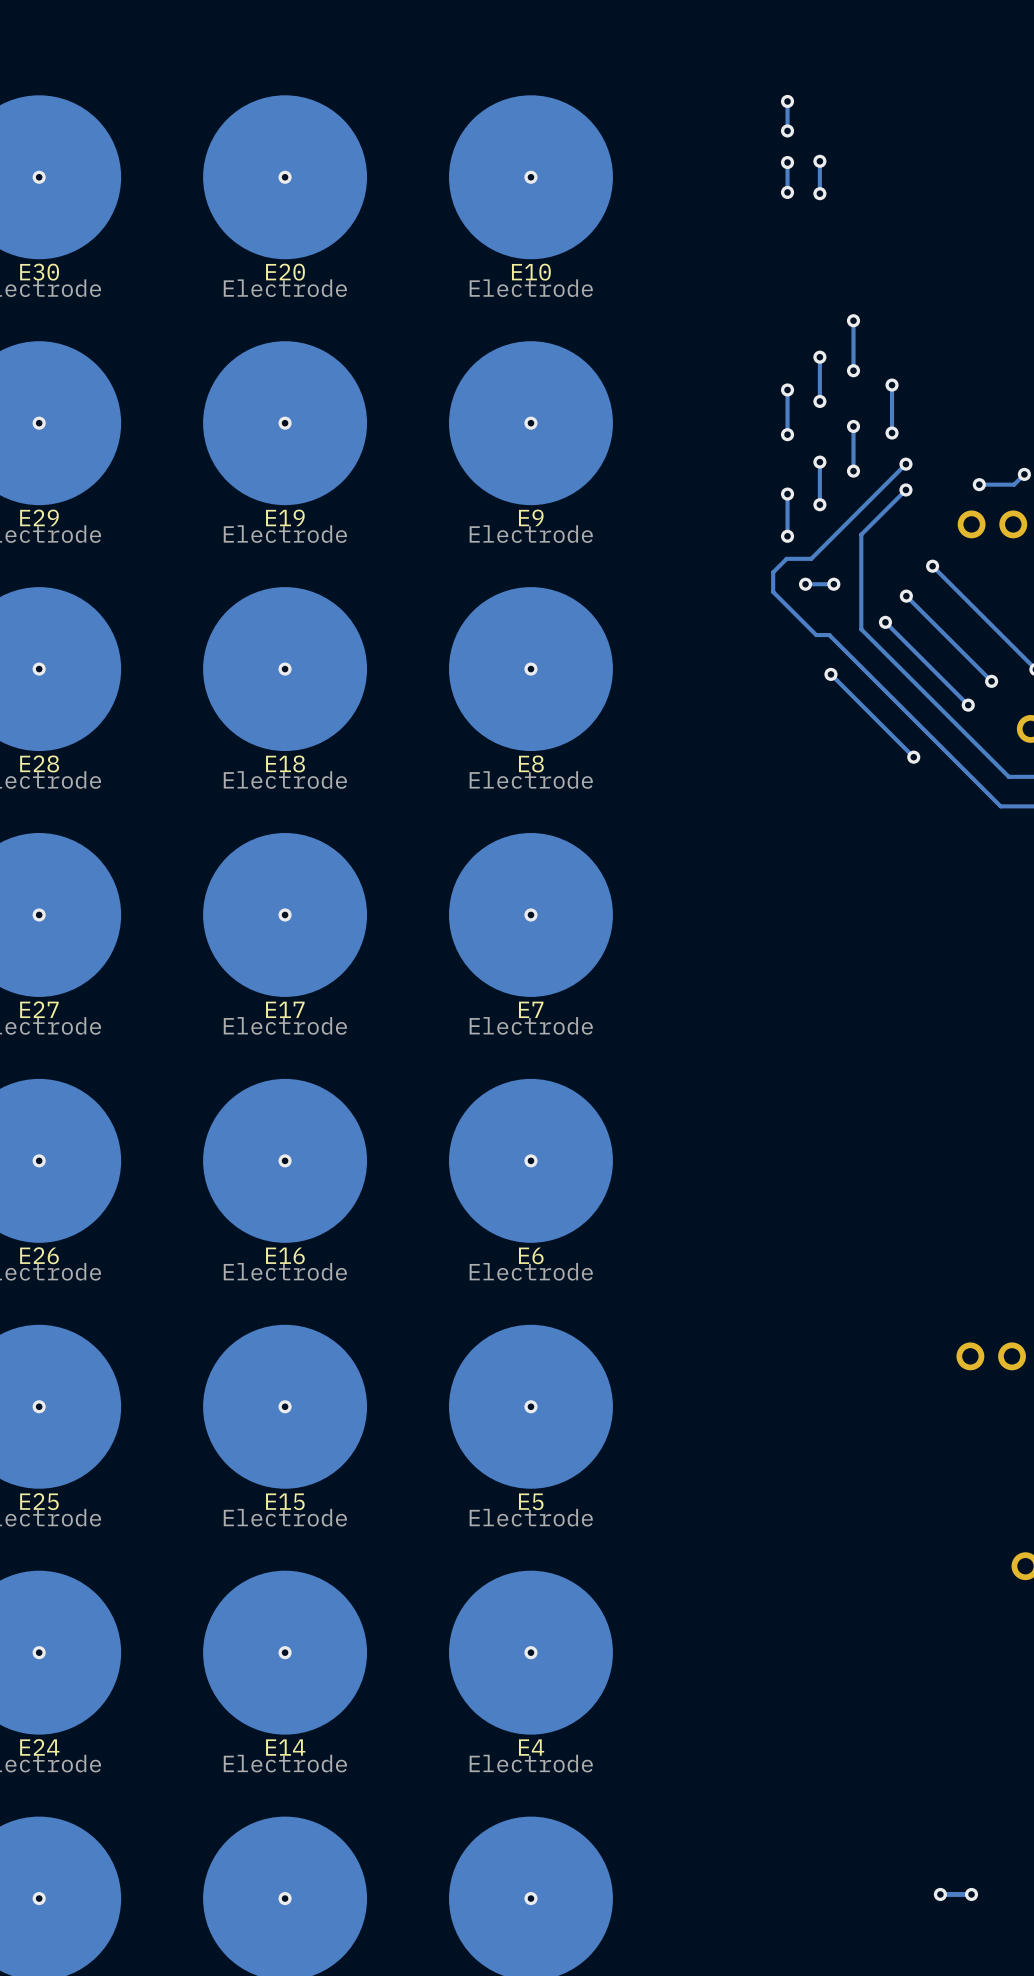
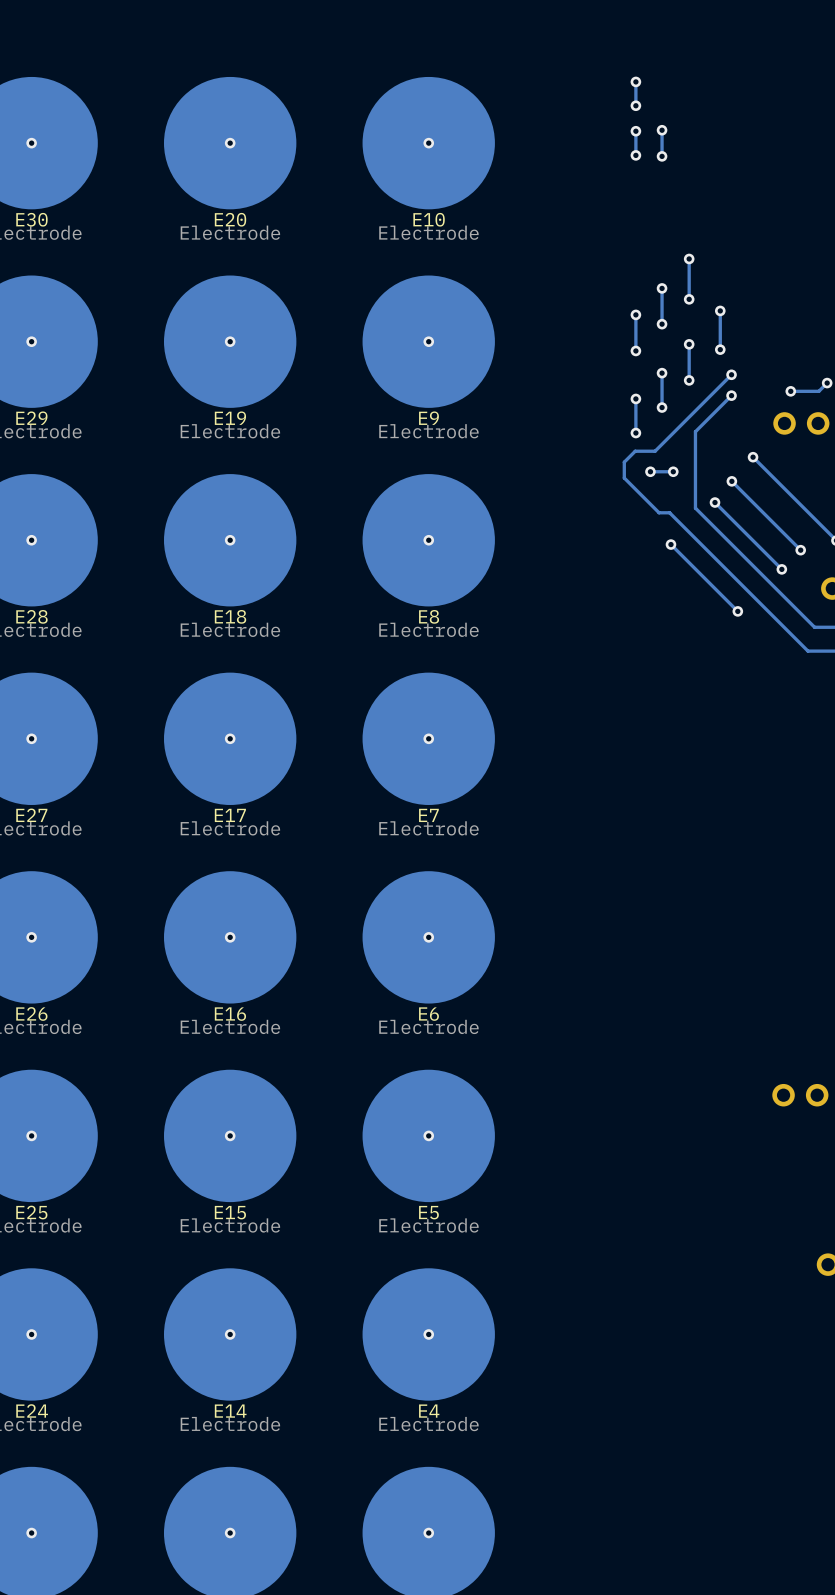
via: (940, 1894) -> none
track: (971, 1894) (940, 1894) -> none
via: (971, 1894) -> none

